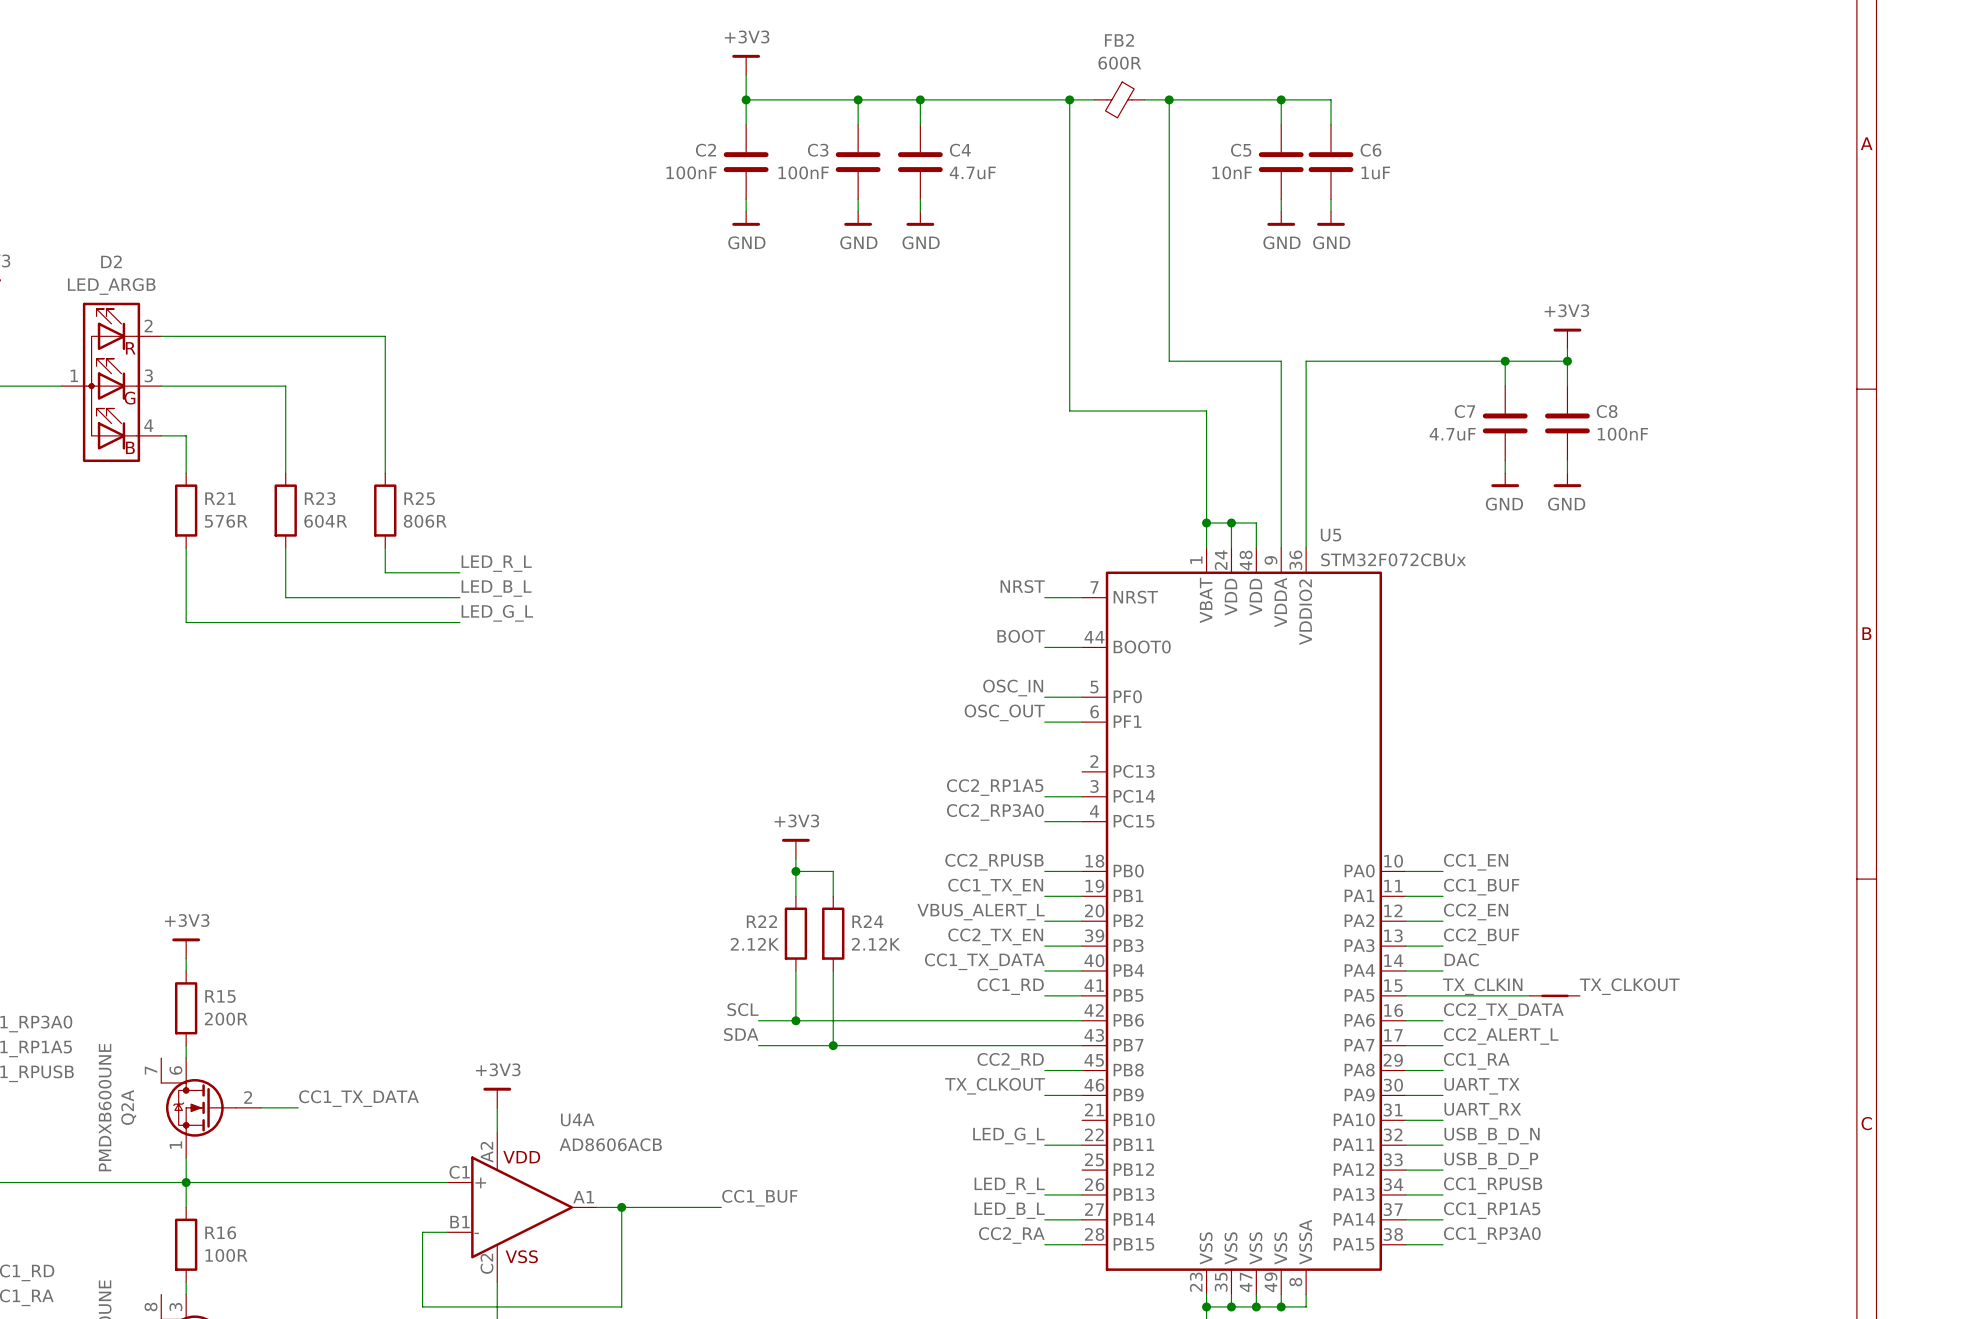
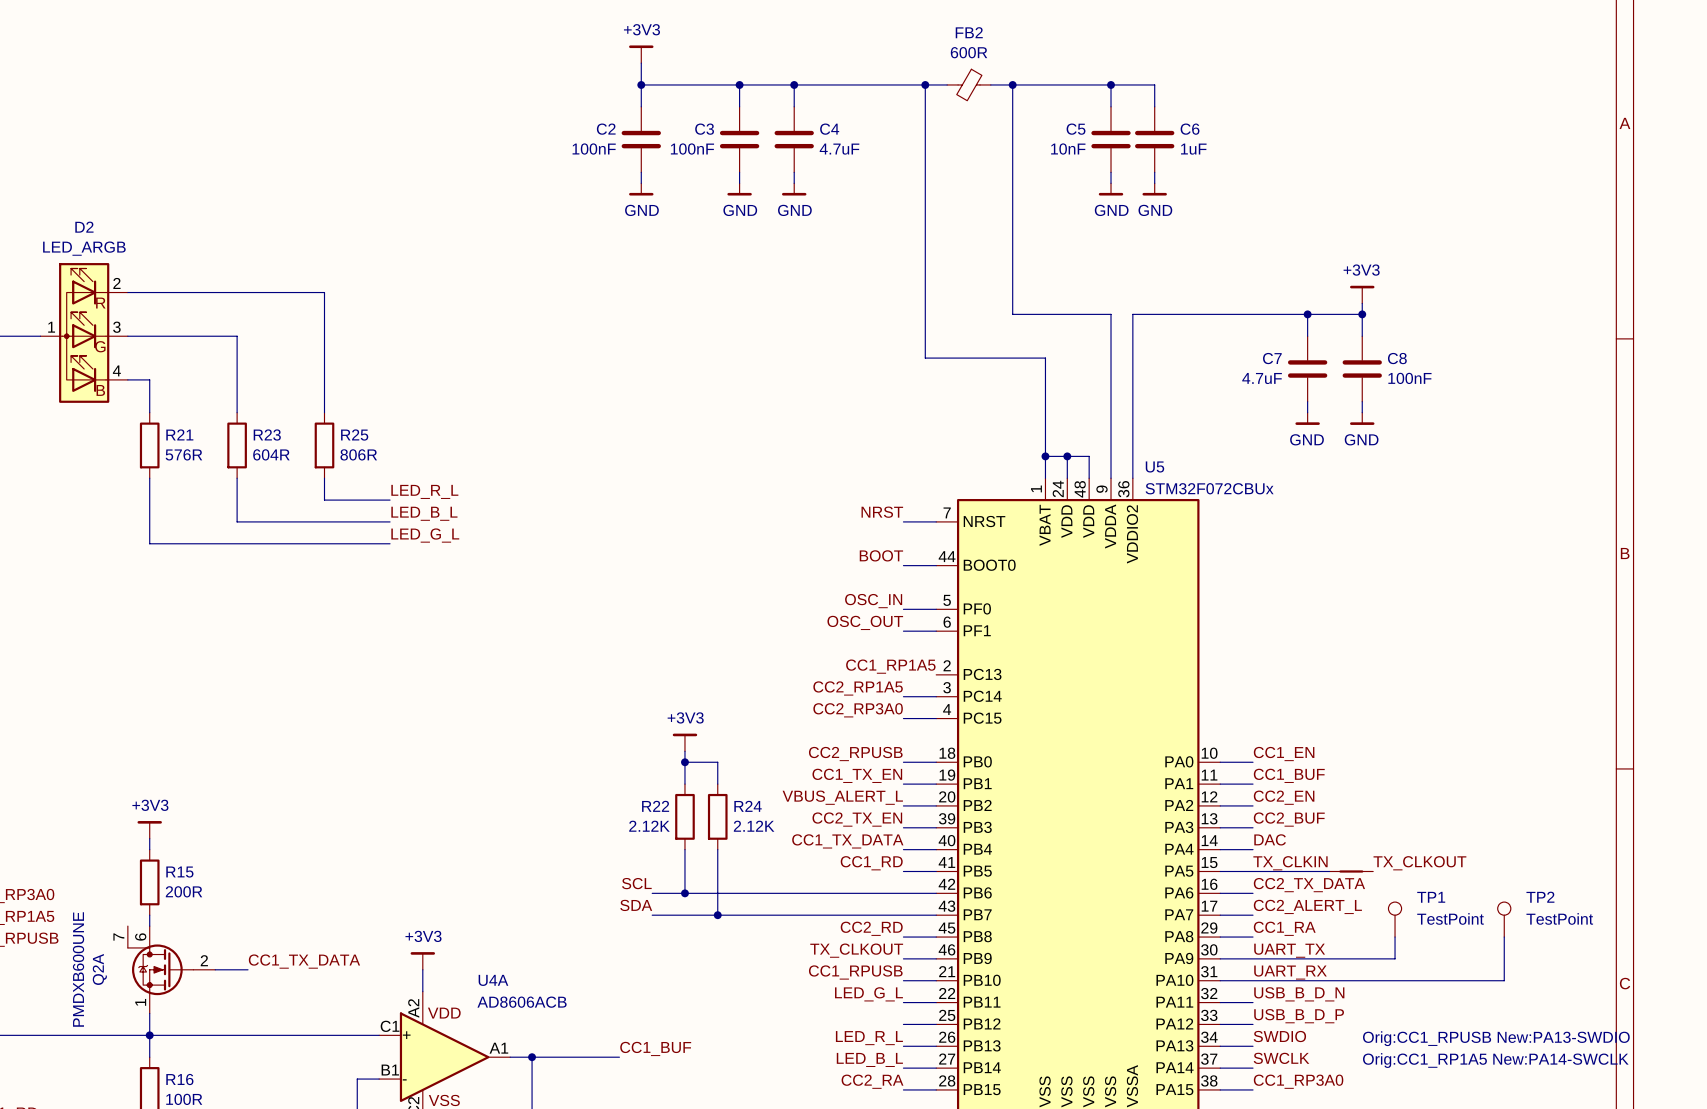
label: none -> CC1_RP1A5 (890, 666)
TP1: none -> TestPoint (1395, 919)
TP2: none -> TestPoint (1504, 919)
wire: none -> (1395, 937) (1395, 958) (1253, 958)
wire: none -> (1504, 937) (1504, 980) (1253, 980)
label: none -> CC1_RPUSB (855, 972)
wire: none -> (903, 980) (936, 980)
wire: none -> (903, 1024) (936, 1024)
label: CC1_RPUSB (1493, 1185) -> SWDIO (1279, 1036)
text: none -> Orig:CC1_RPUSB New:PA13-SWDIO (1496, 1038)
label: CC1_RP1A5 (1492, 1210) -> SWCLK (1281, 1058)
text: none -> Orig:CC1_RP1A5 New:PA14-SWCLK (1495, 1060)

